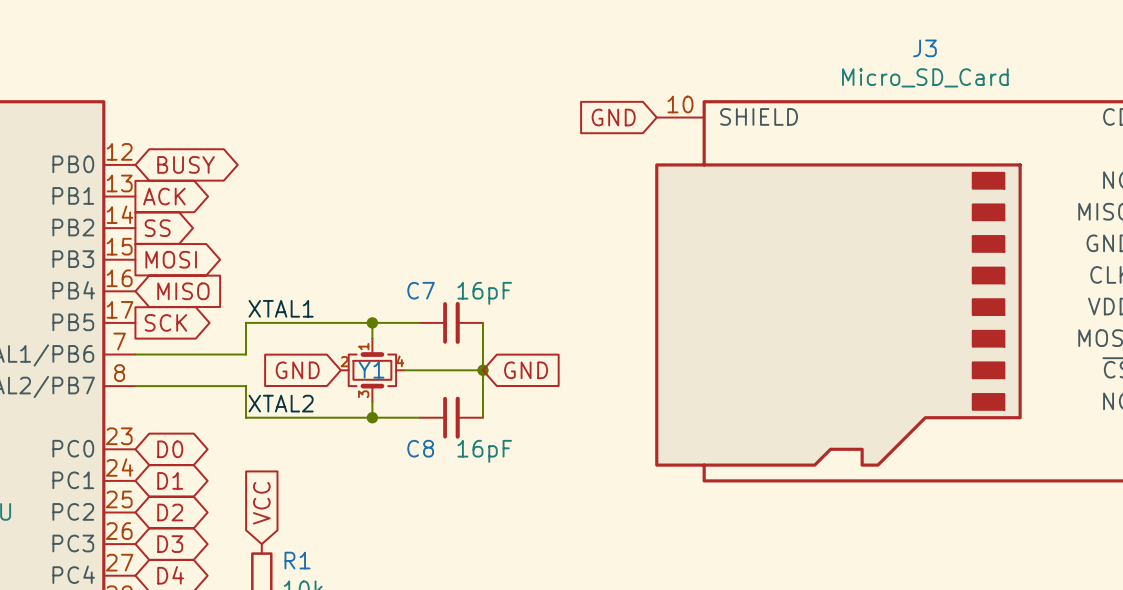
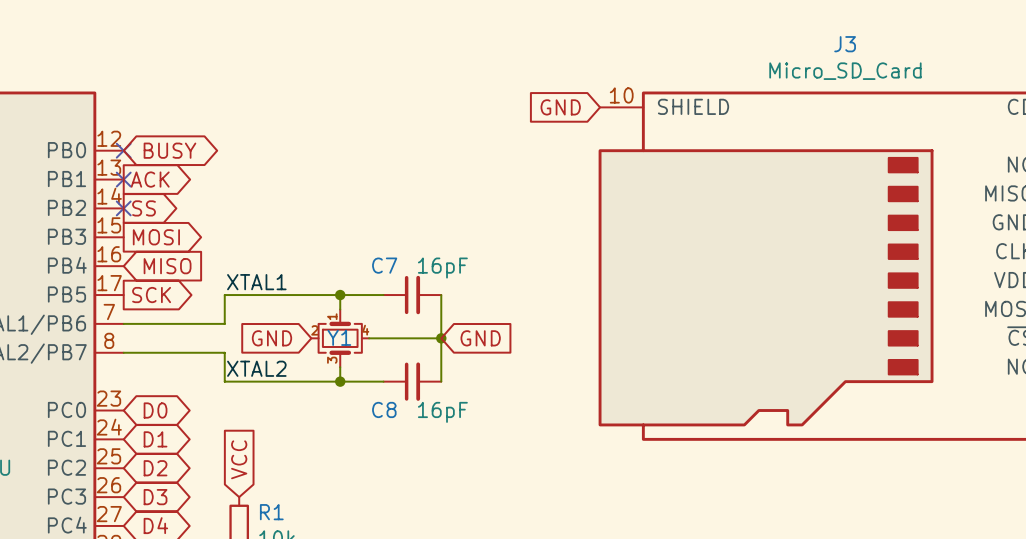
no-connect mark: none -> (123, 150)
no-connect mark: none -> (123, 179)
no-connect mark: none -> (123, 208)

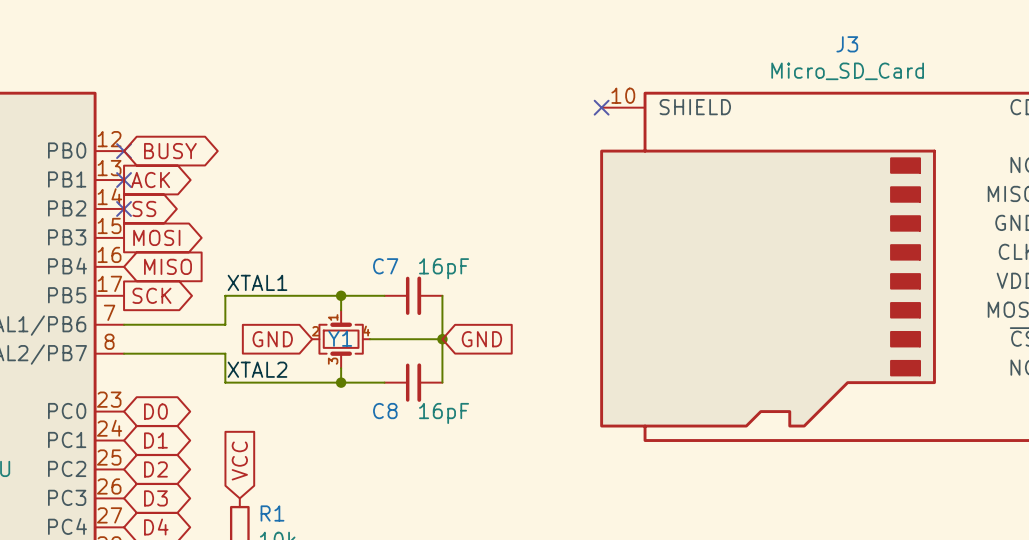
global label: GND (560, 107) -> none
no-connect mark: none -> (601, 107)

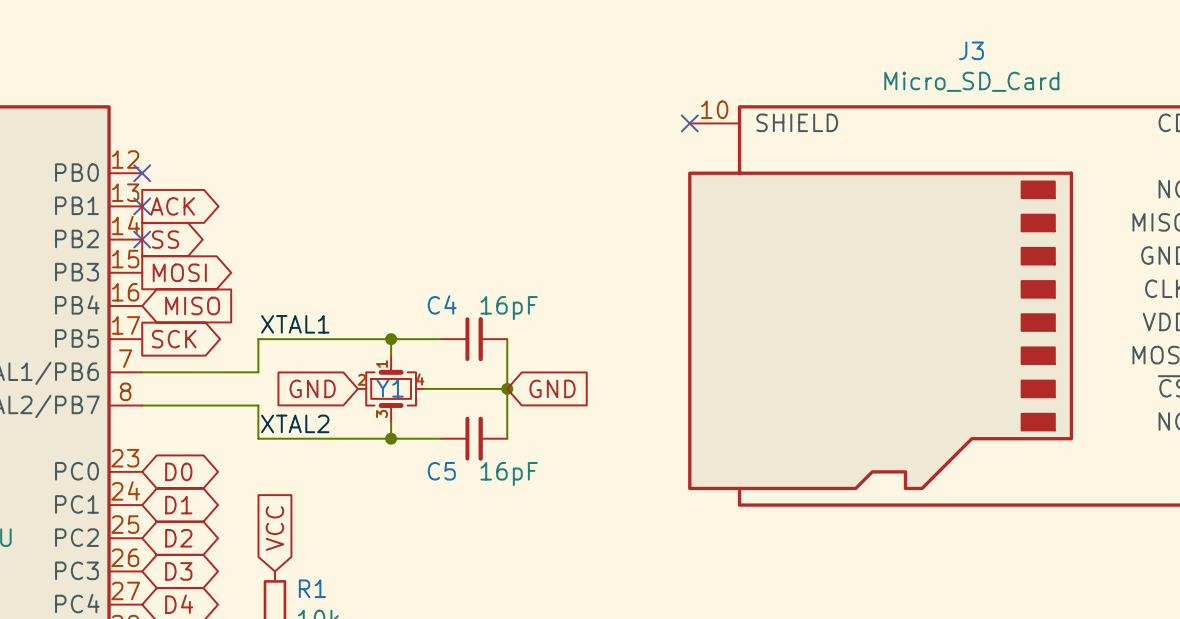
global label: BUSY (170, 151) -> none
C7 name: C7 (385, 266) -> C4 (442, 304)
C8 name: C8 (385, 411) -> C5 (441, 471)

